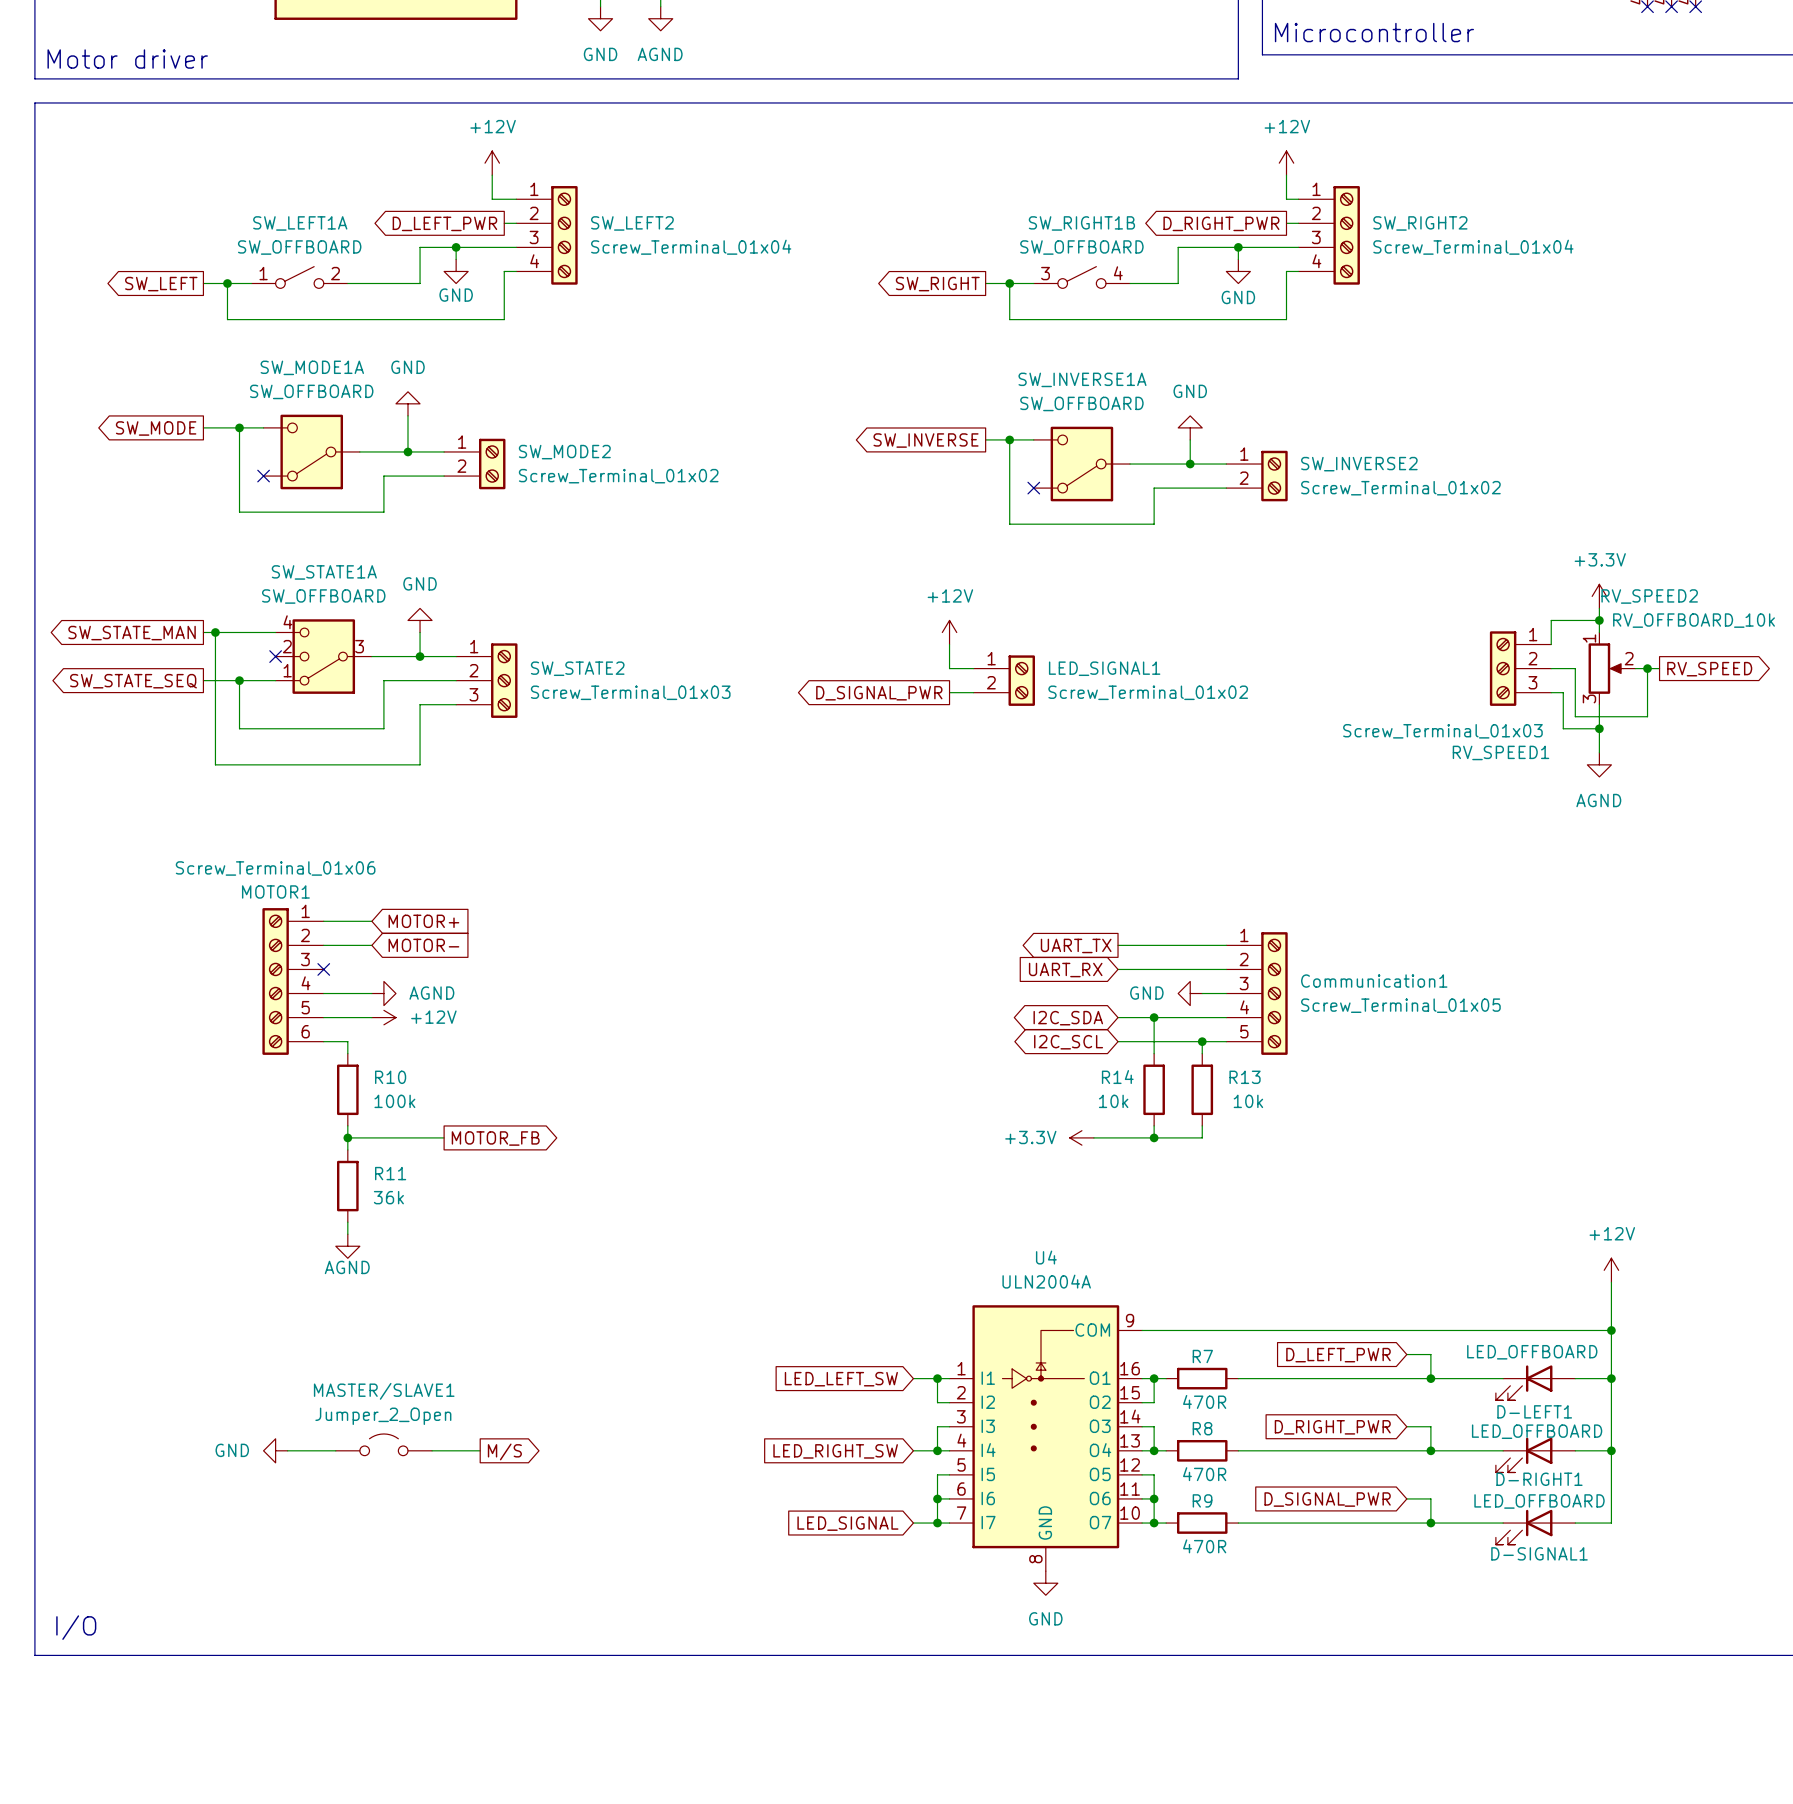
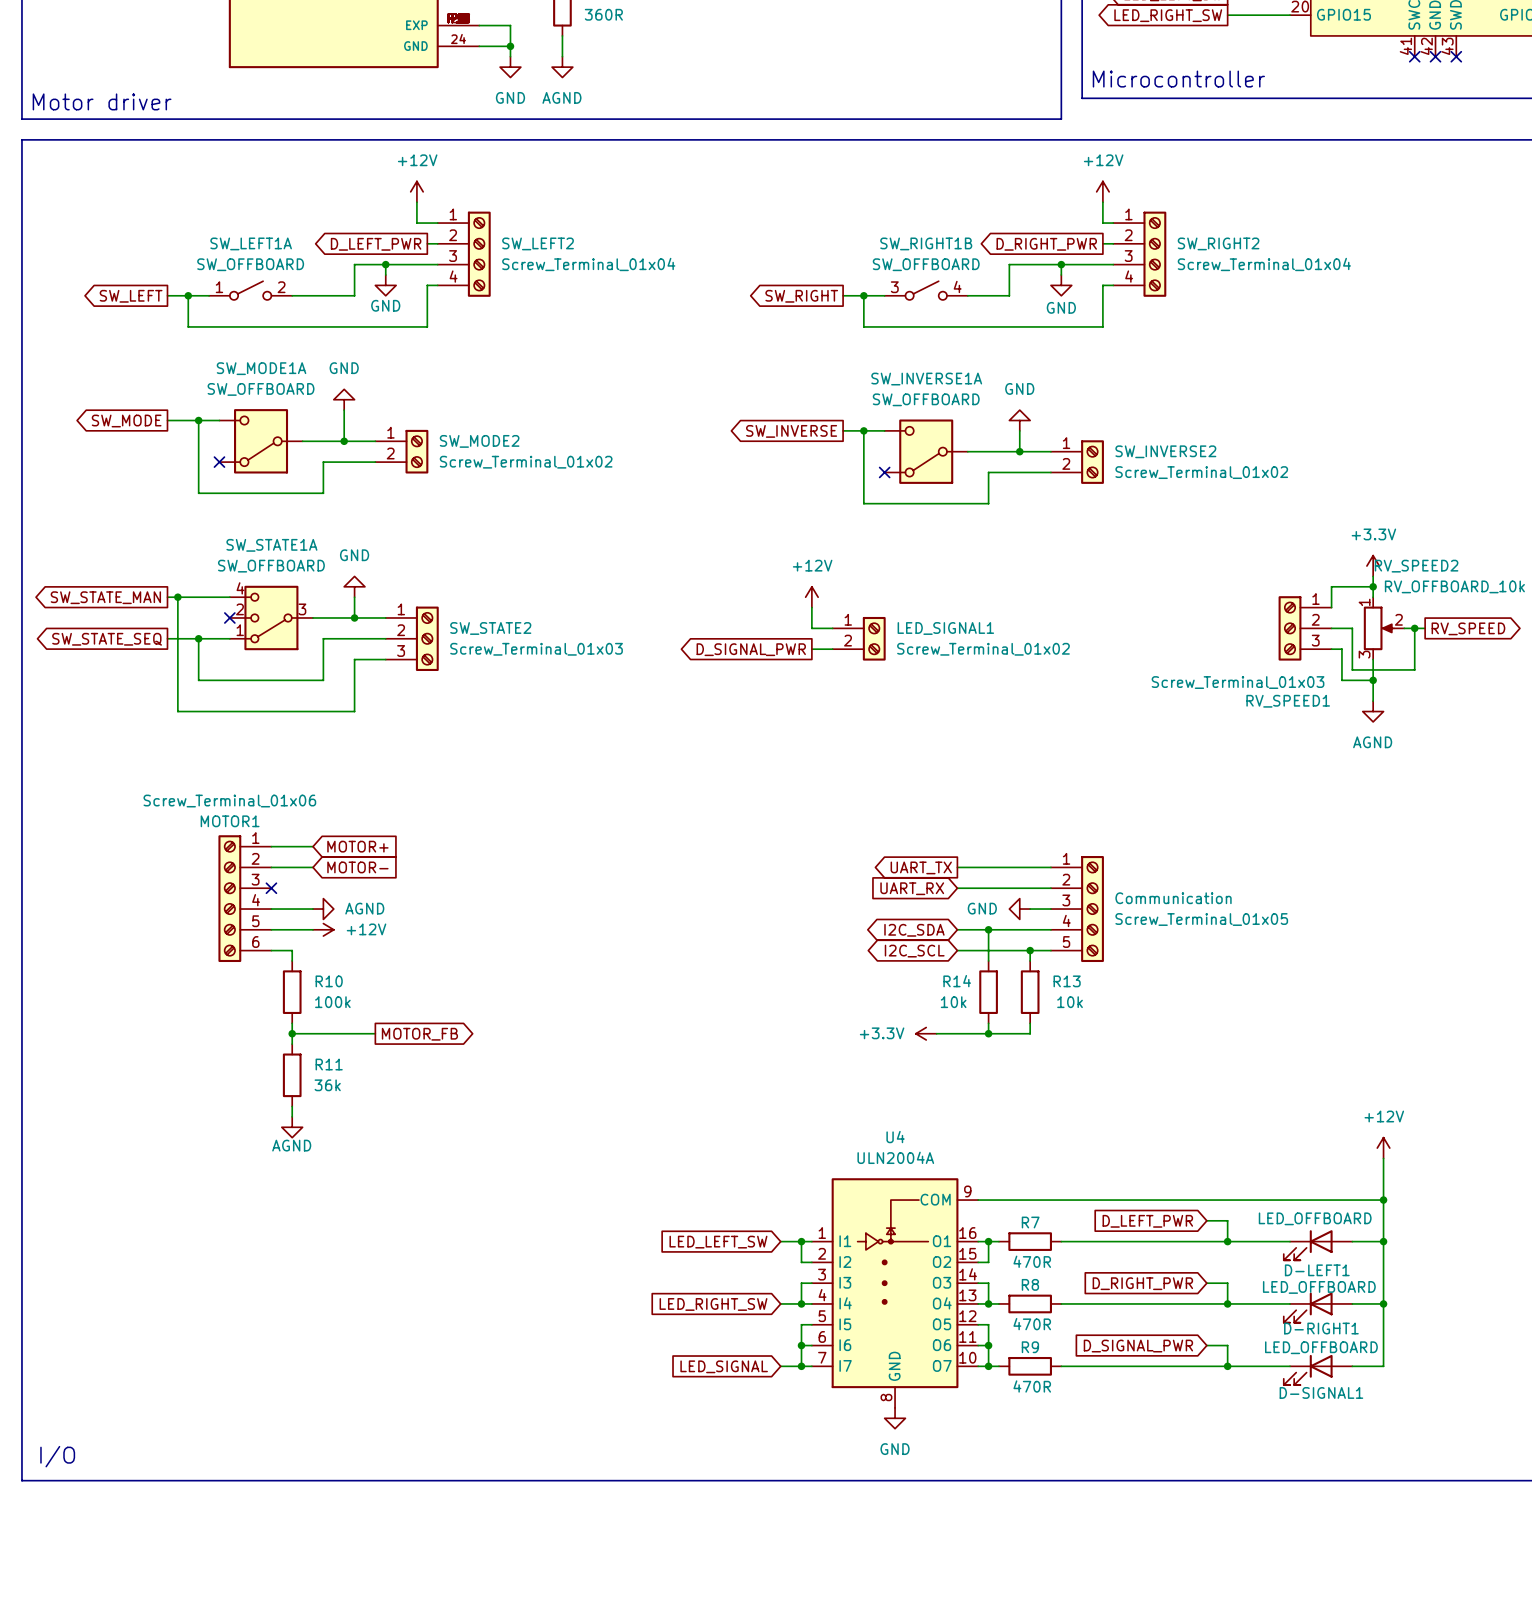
Communication1 name: Communication1 (1374, 981) -> Communication (1173, 898)
MASTER/SLAVE1: Jumper_2_Open (383, 1444) -> none
power symbol: GND (275, 1450) -> none
wire: (287, 1450) (335, 1450) -> none
wire: (432, 1450) (480, 1450) -> none
global label: M/S (504, 1451) -> none

